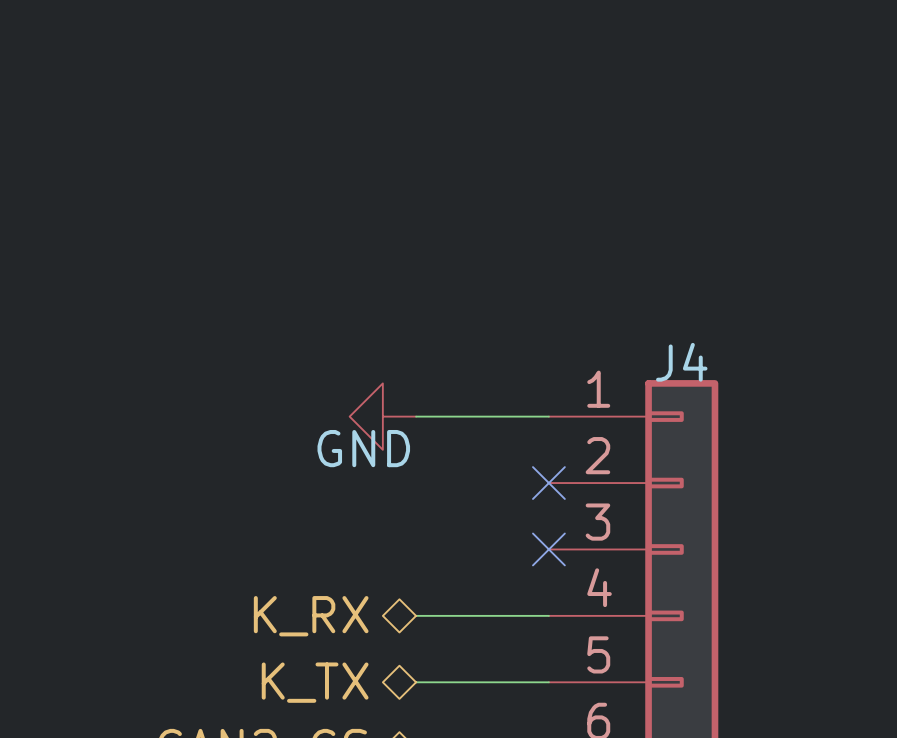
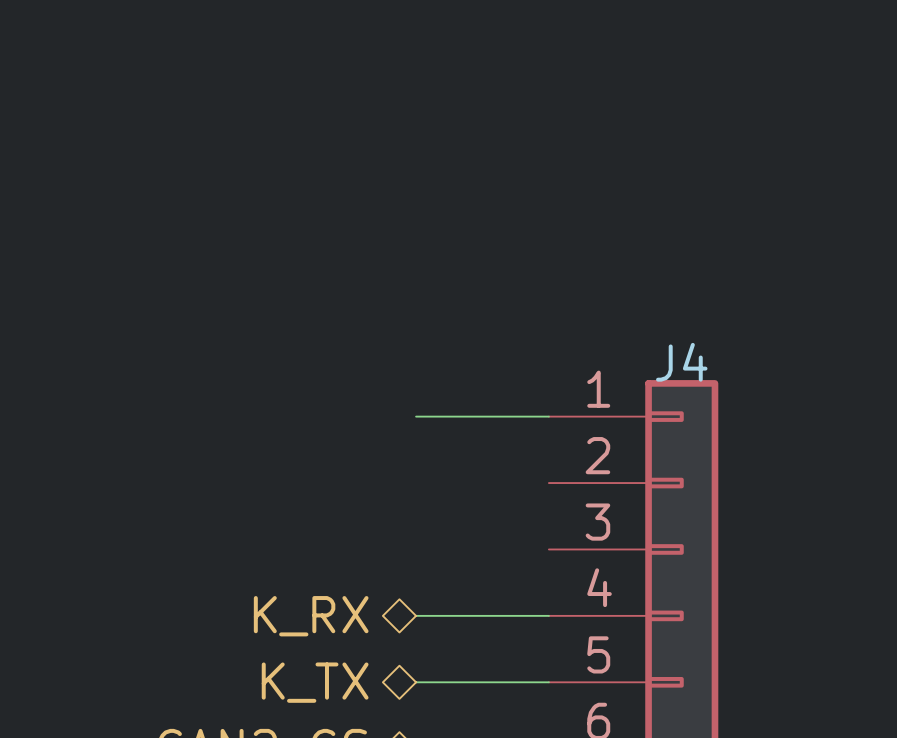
power symbol: GND (382, 416) -> none
no-connect mark: (548, 483) -> none
no-connect mark: (548, 549) -> none

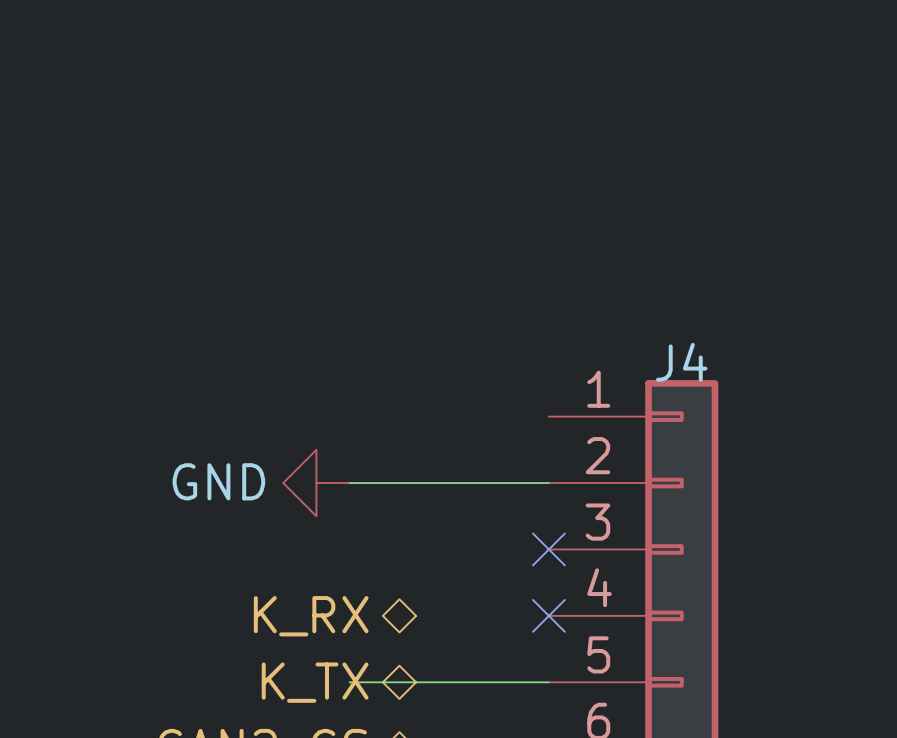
wire: (416, 416) (548, 416) -> none
power symbol: none -> GND (316, 483)
wire: none -> (349, 483) (548, 483)
no-connect mark: none -> (548, 549)
wire: (416, 615) (548, 615) -> none
no-connect mark: none -> (548, 615)
wire: none -> (349, 682) (416, 682)

